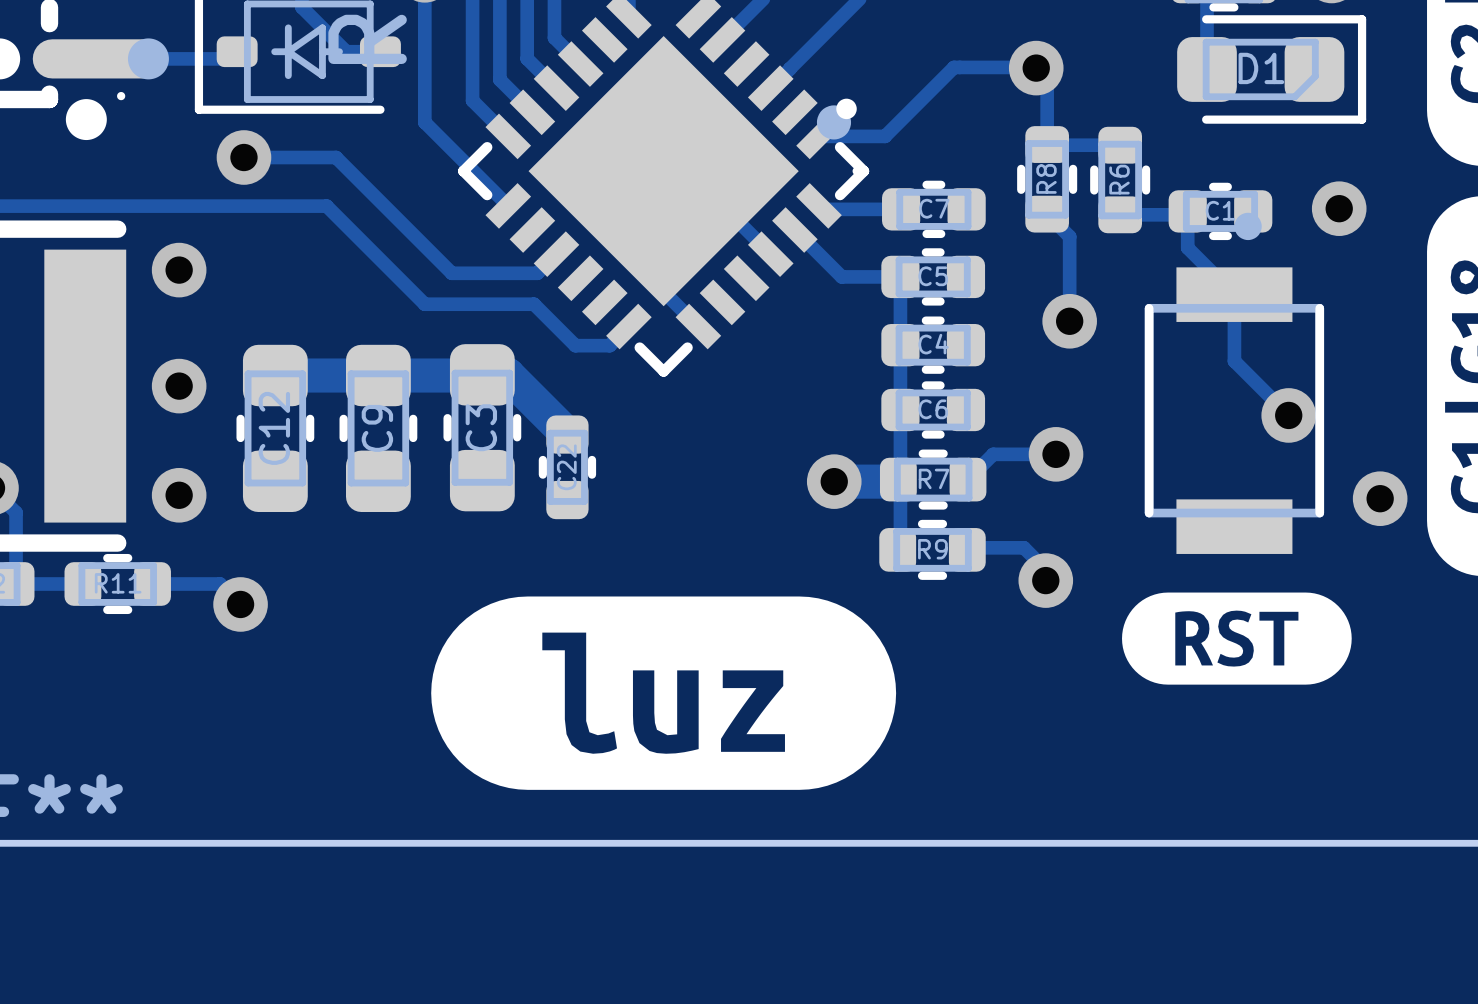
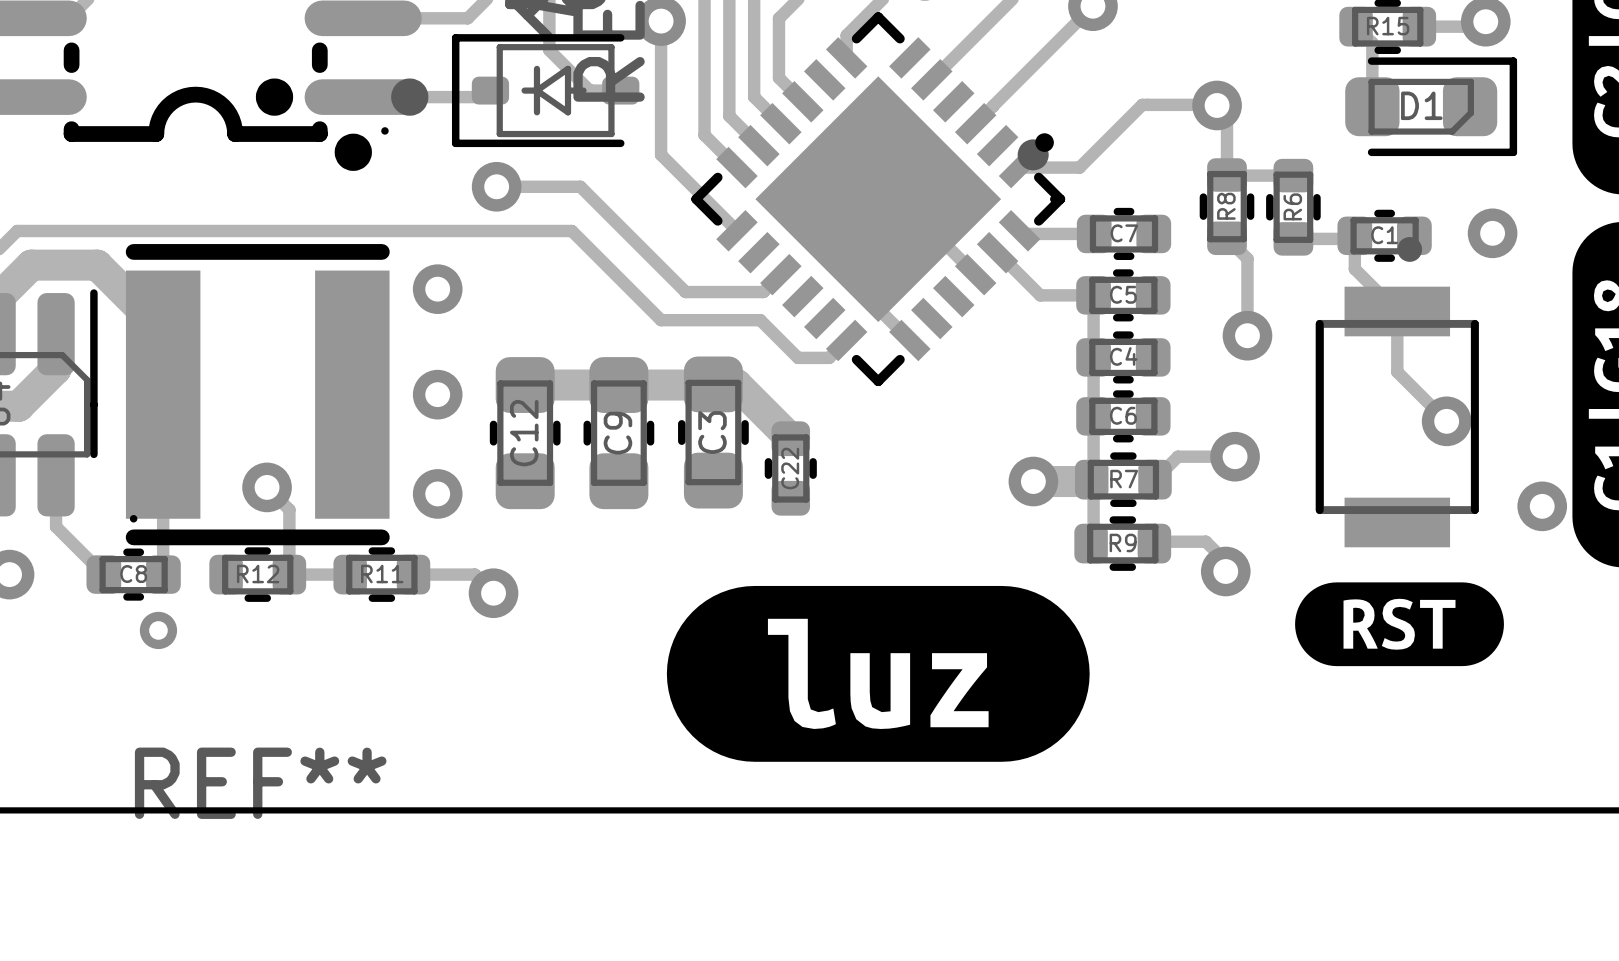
via position: (1380, 498) -> (1542, 506)

